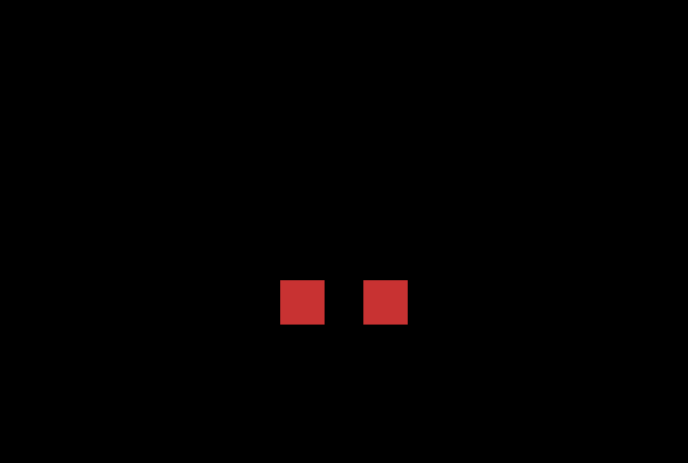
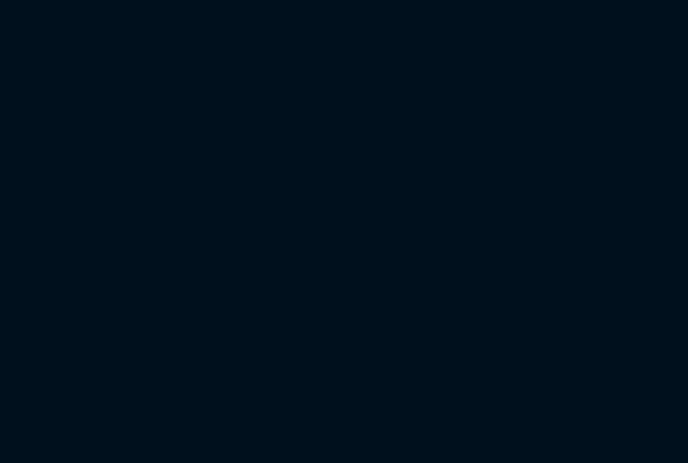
part: (343, 302) -> none

